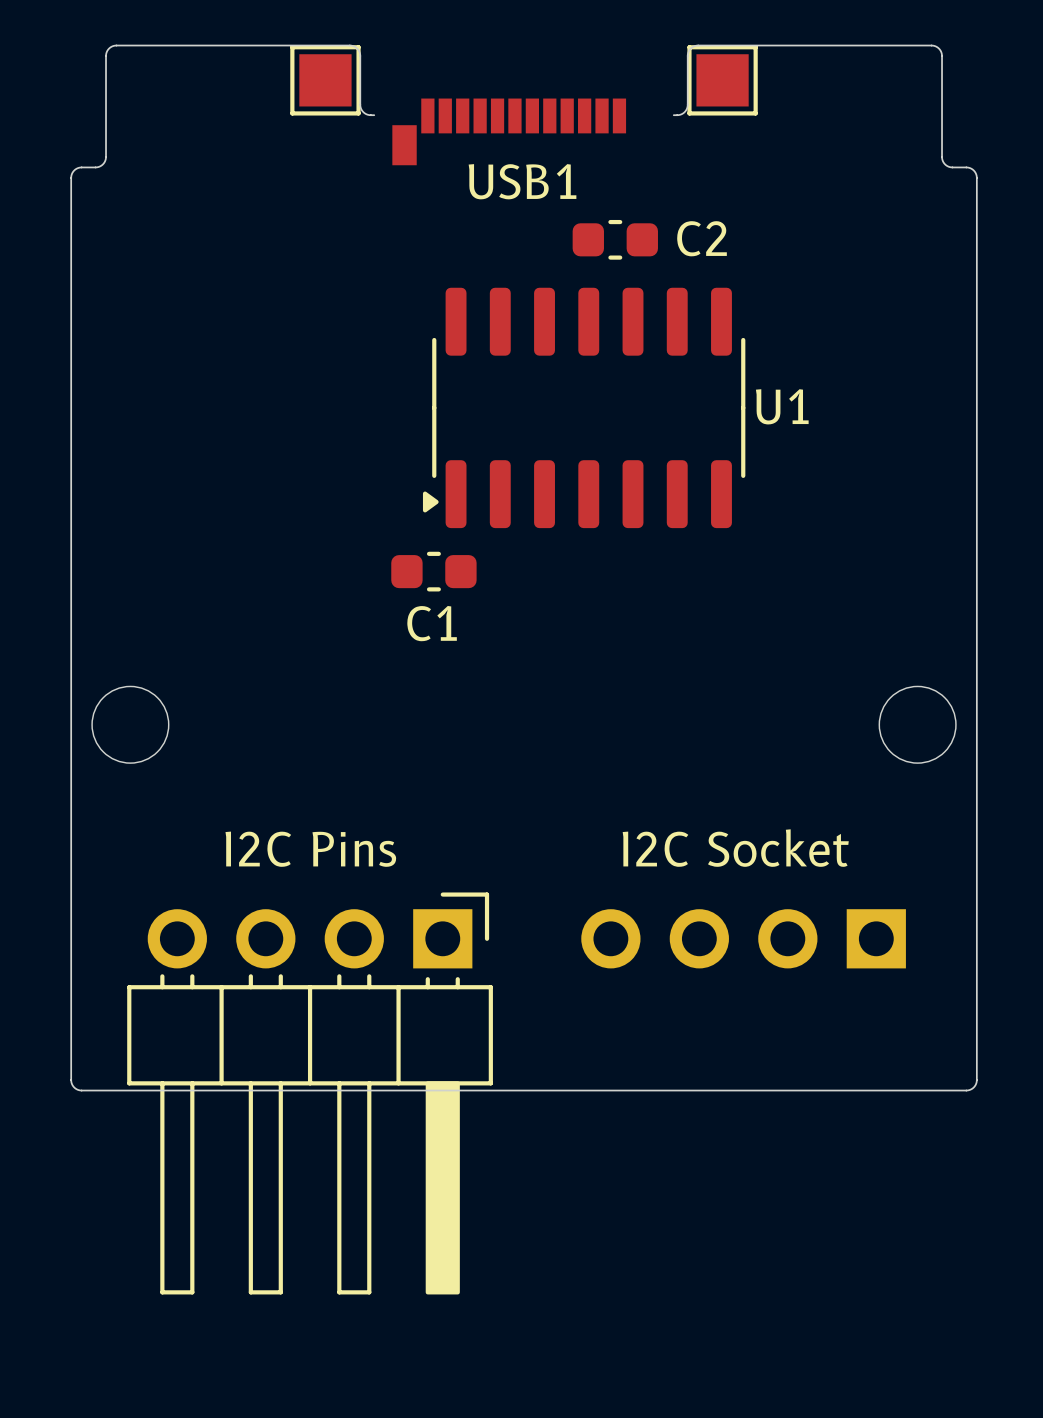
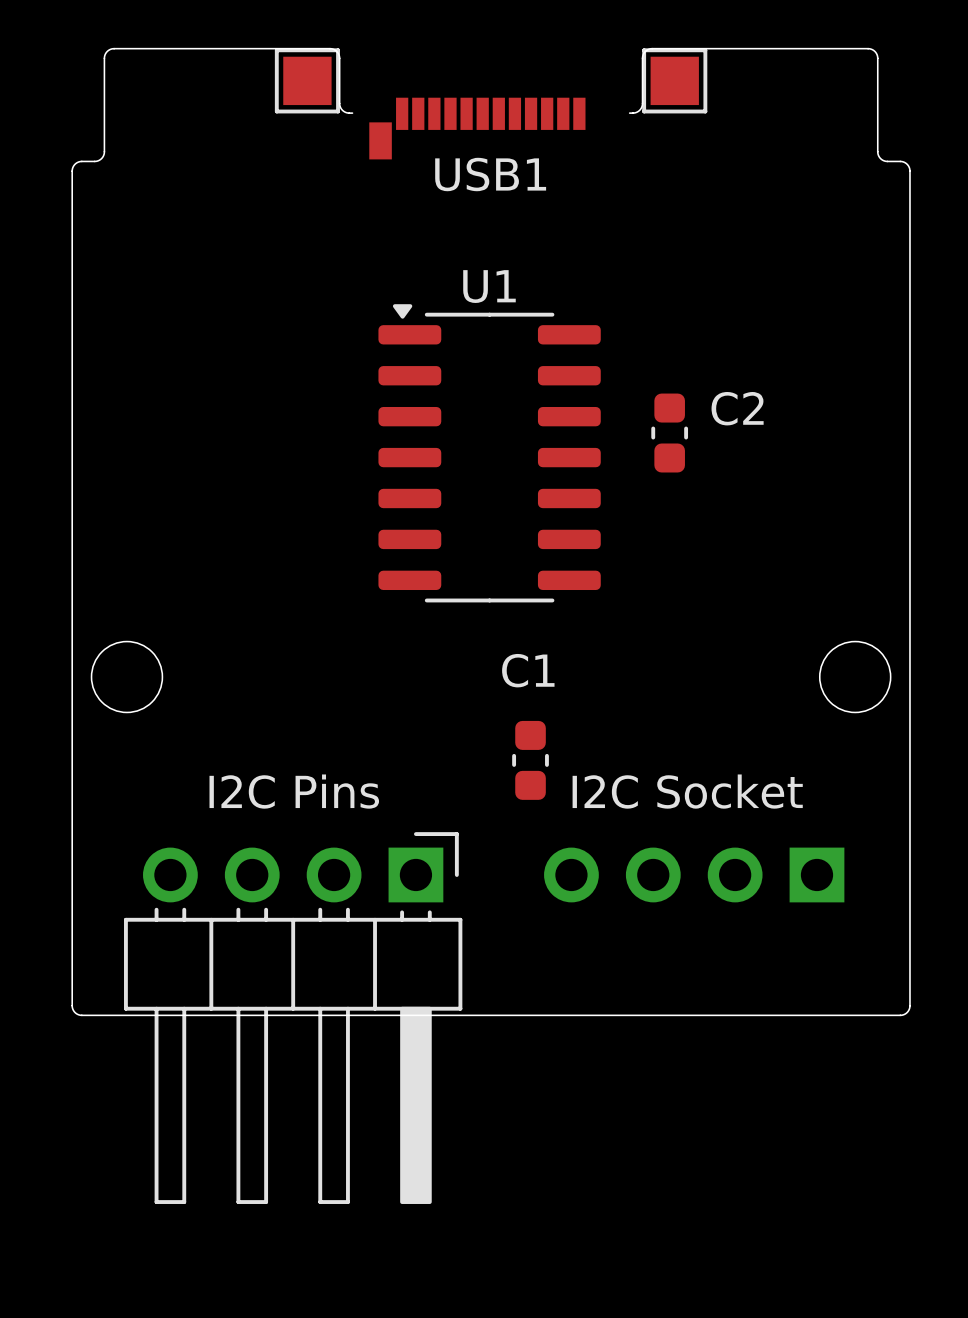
C2 rotation: 0° (615, 239) -> 90° clockwise (669, 433)
C2 position: (615, 239) -> (669, 433)
U1 name position: U1 (782, 406) -> U1 (489, 286)
U1 rotation: 0° (584, 407) -> 90° clockwise (489, 453)
C1 rotation: 0° (433, 571) -> 90° clockwise (530, 760)
C1 position: (433, 571) -> (530, 760)
C1 name position: C1 (432, 623) -> C1 (528, 670)

